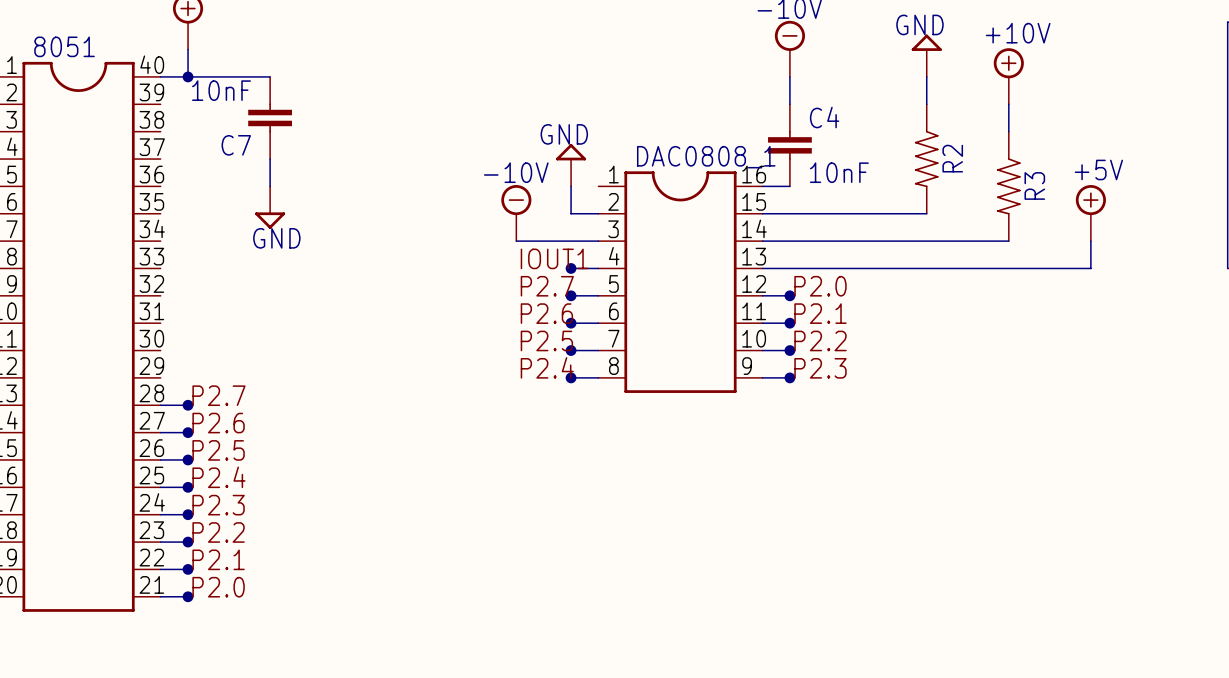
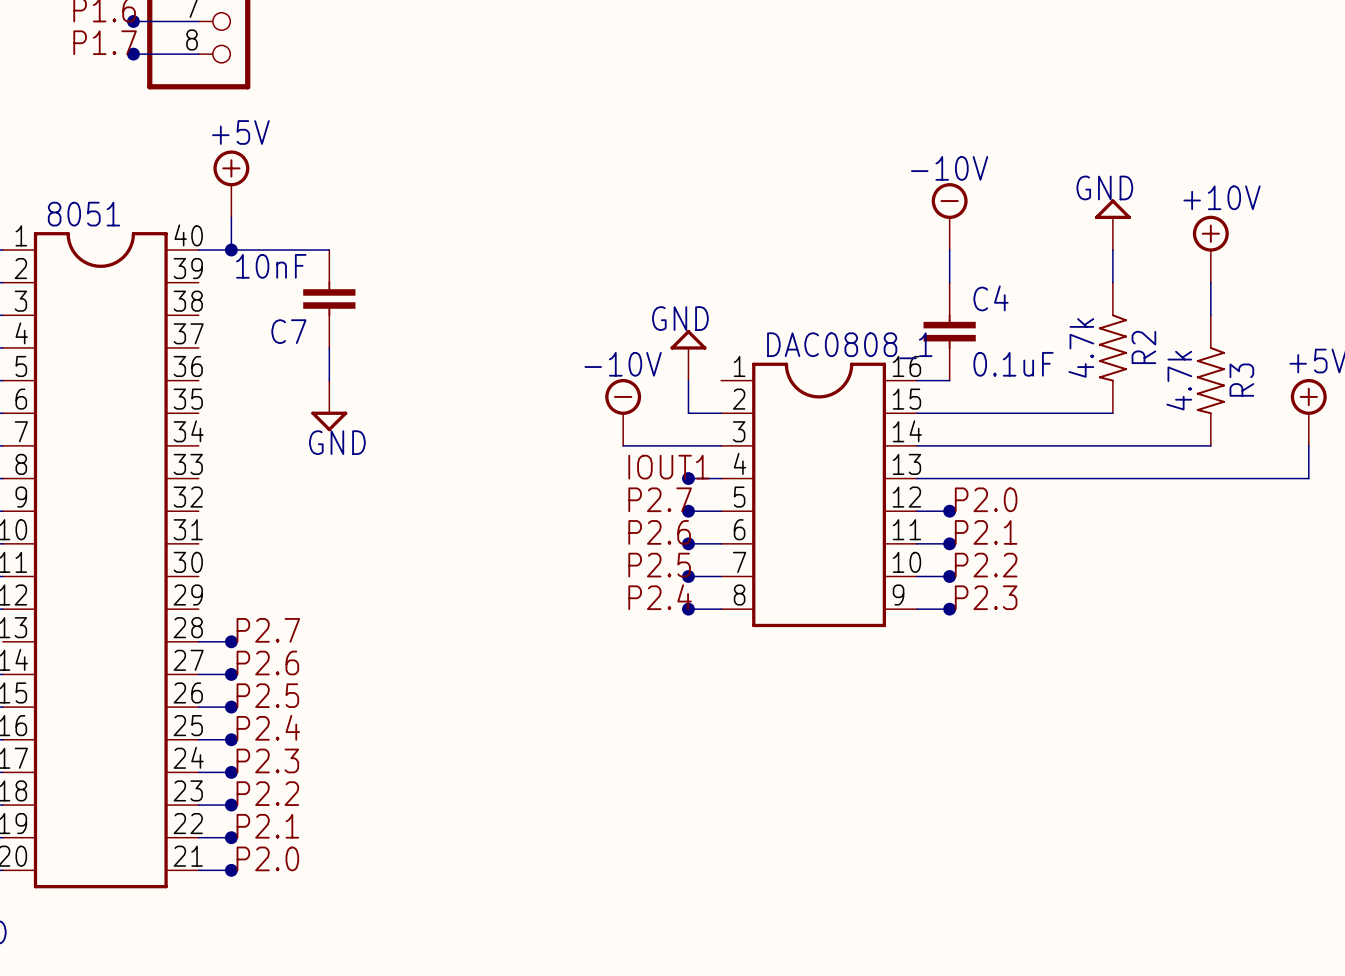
R2 value: none -> 4.7k (1081, 347)
C4 value: 10nF (839, 172) -> 0.1uF (1013, 364)
R3 value: none -> 4.7k (1179, 380)

